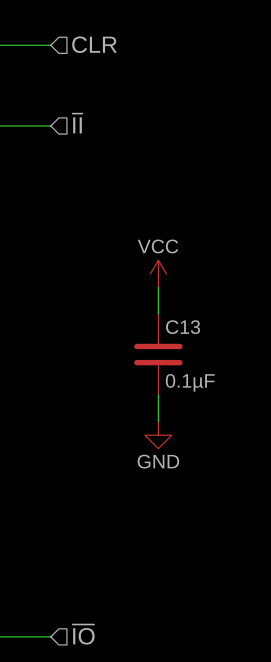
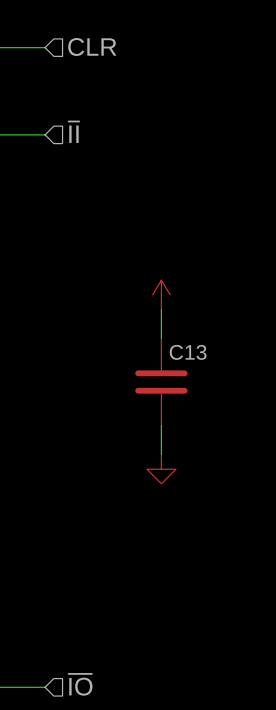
power symbol text: VCC (158, 246) -> none
C13 value: 0.1µF (190, 382) -> none
power symbol text: GND (158, 461) -> none

